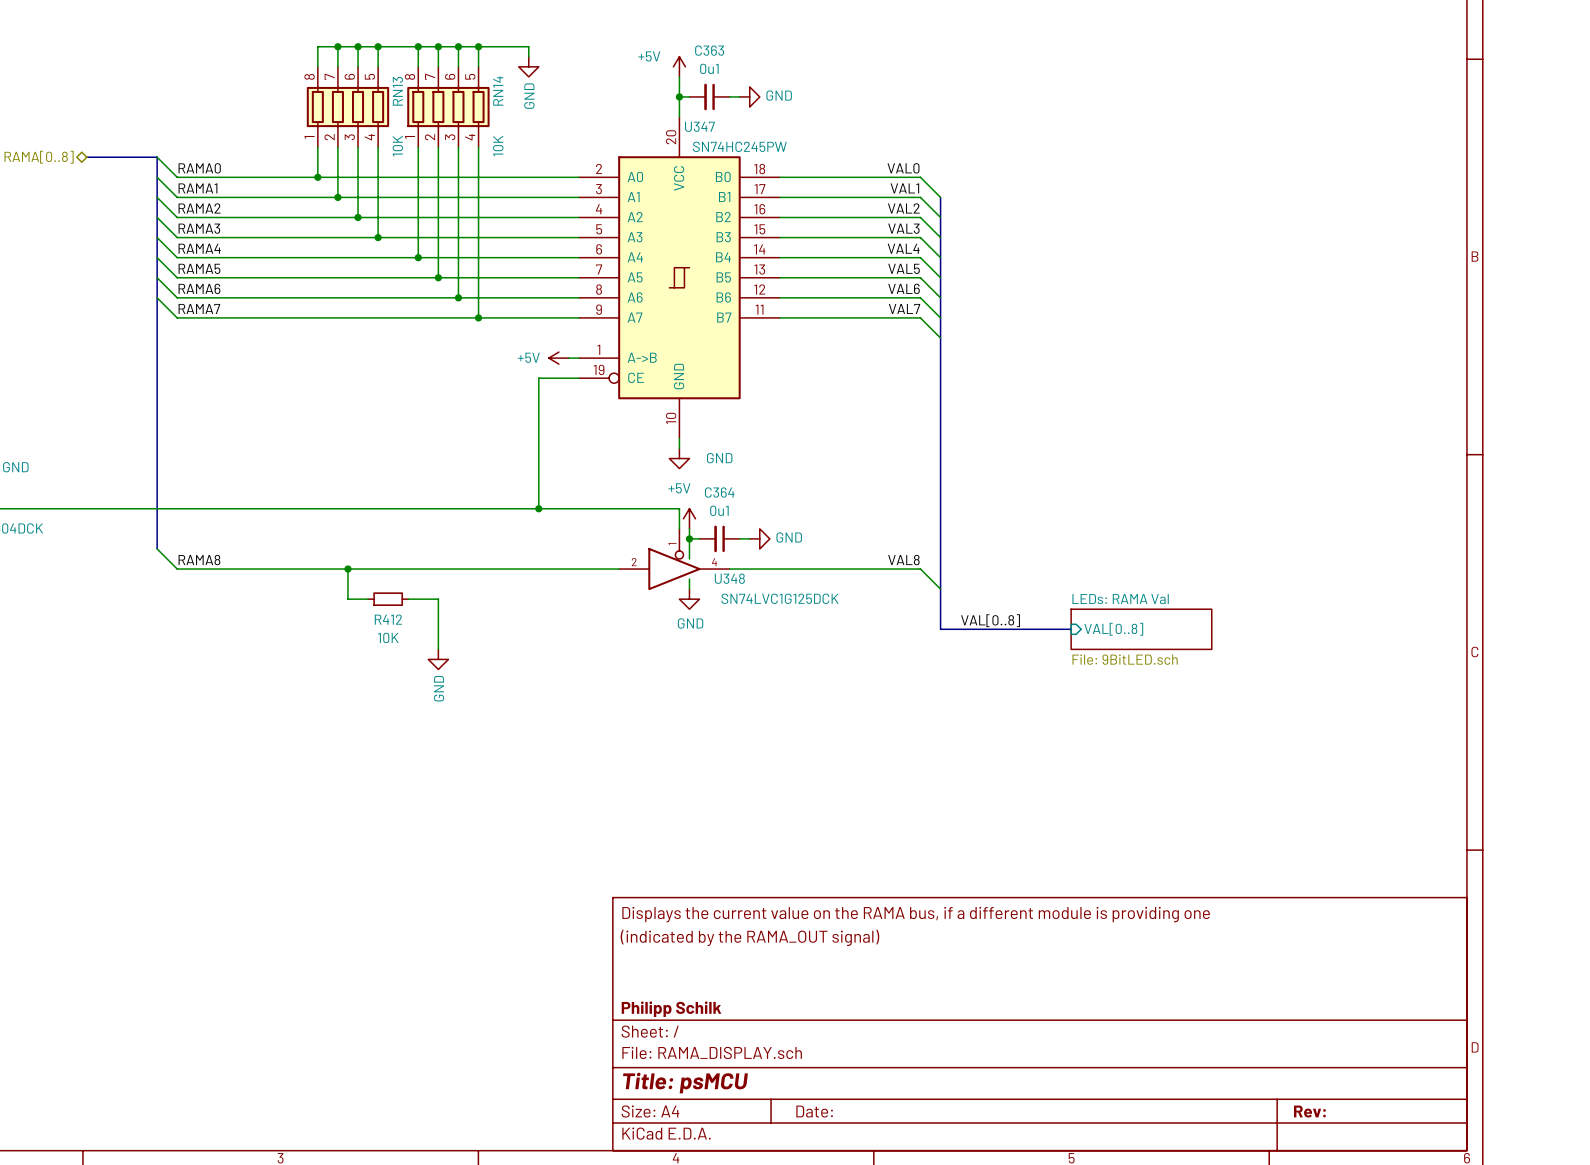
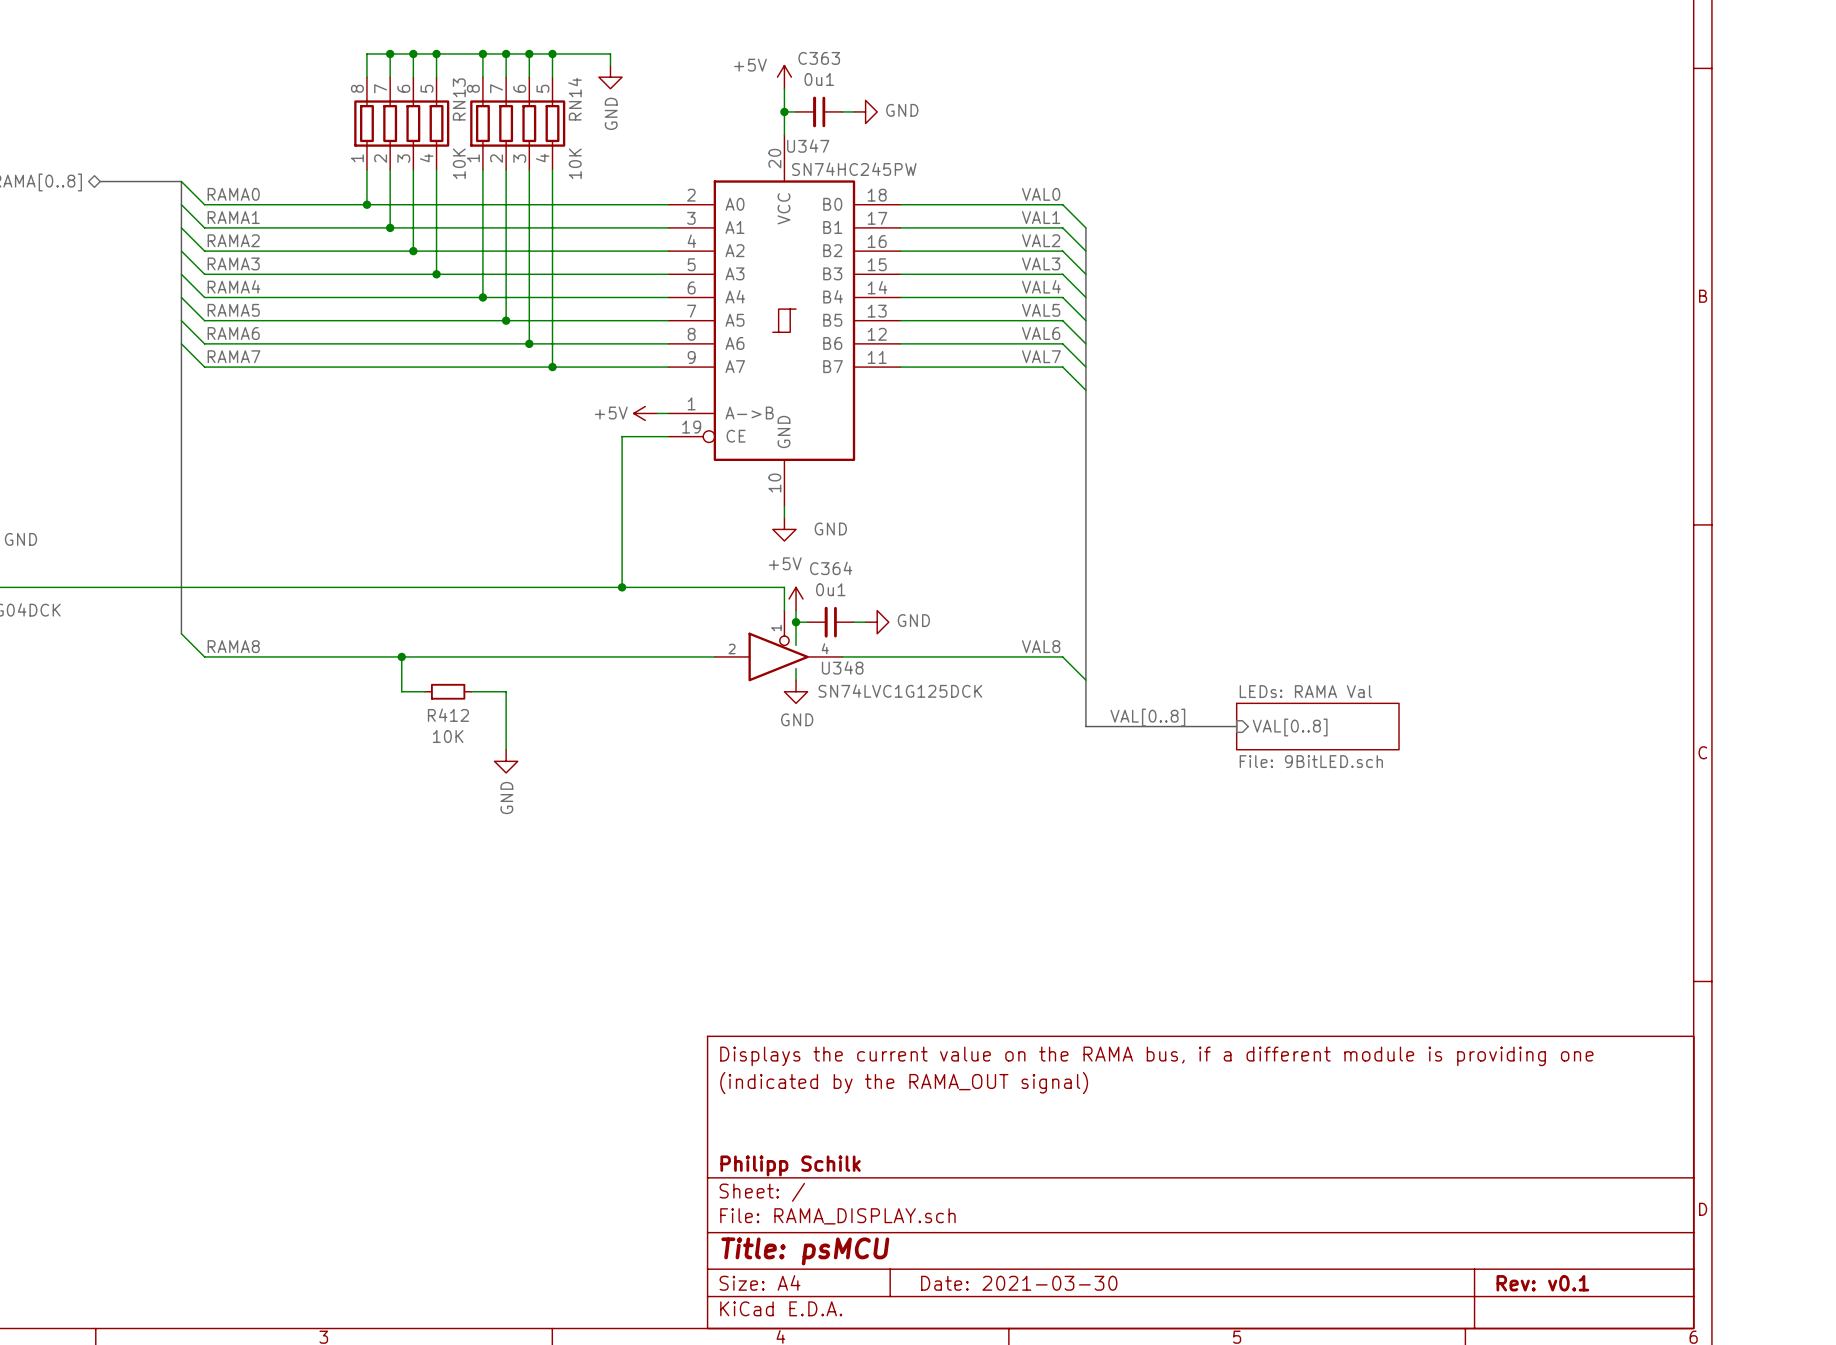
title block: Date: (814, 1111) -> Date: 2021-03-30 (1019, 1283)
title block: Rev: (1309, 1111) -> Rev: v0.1 (1542, 1283)

